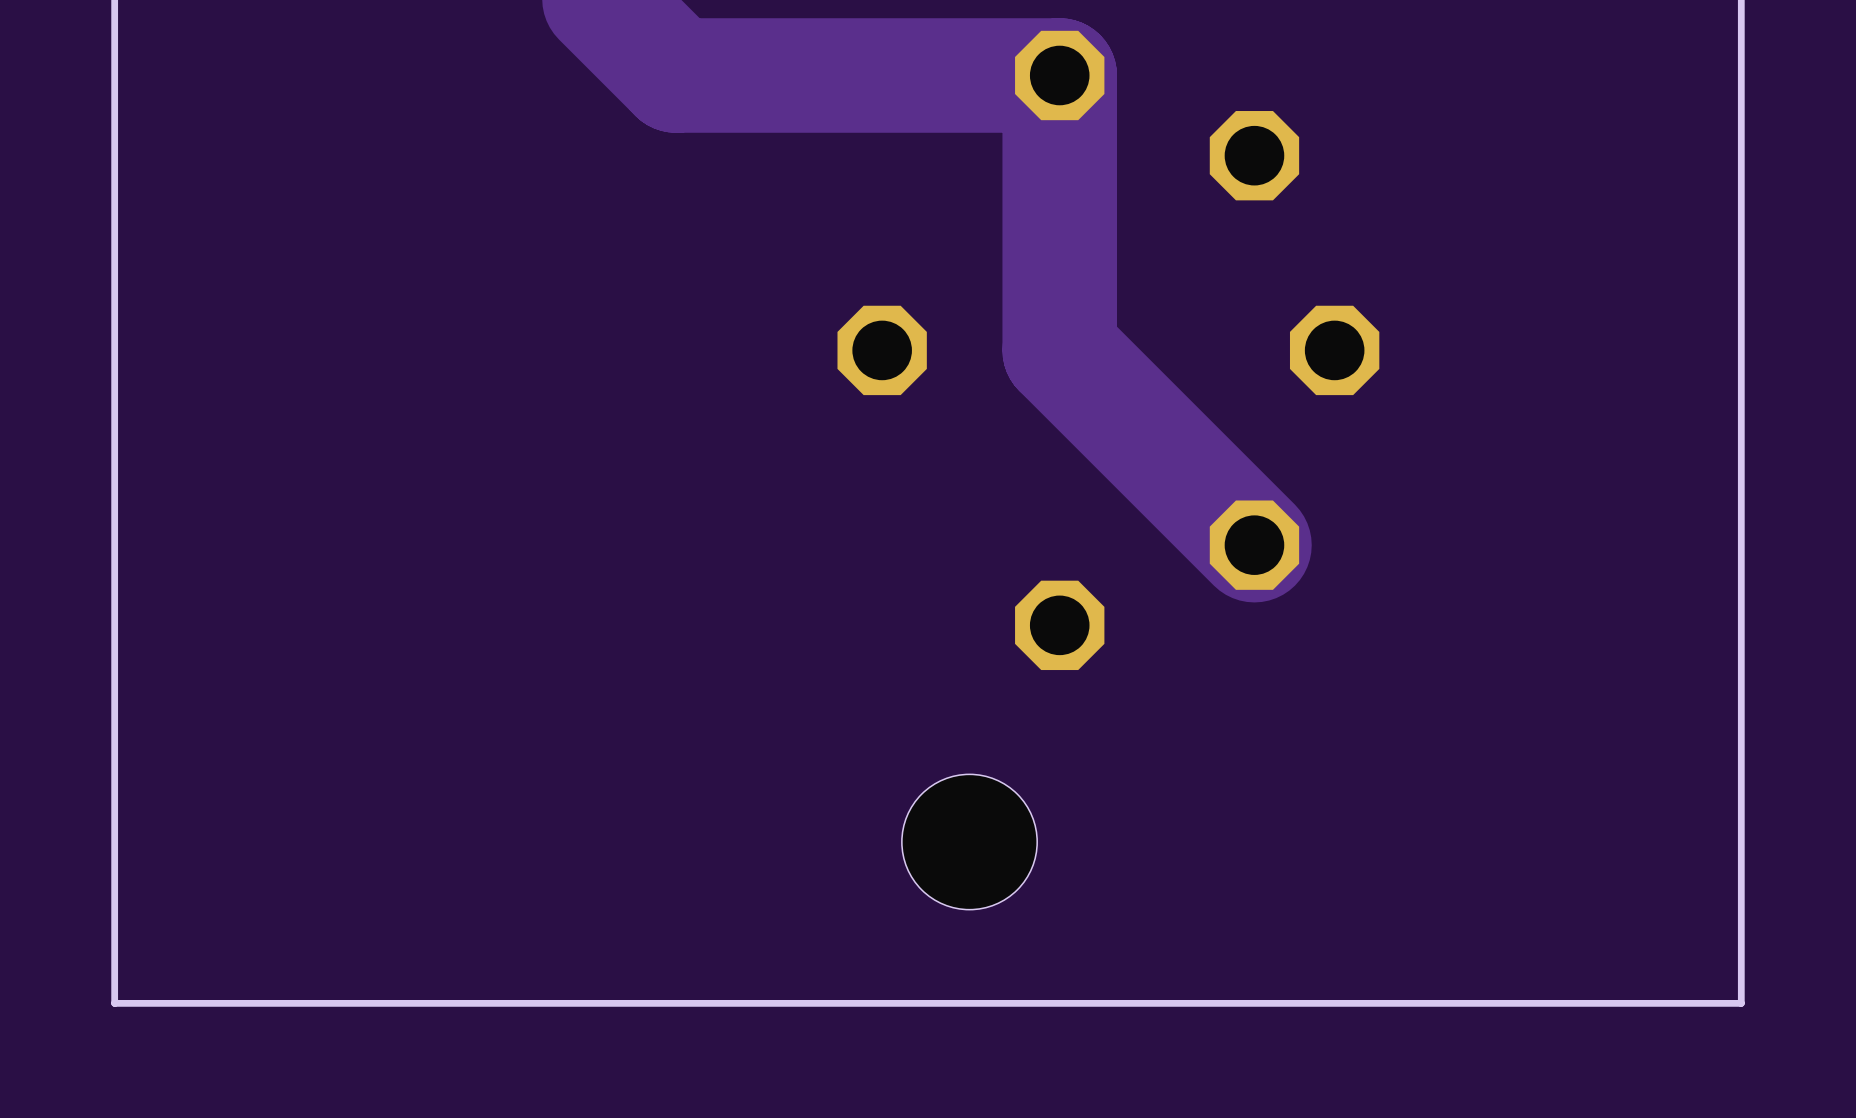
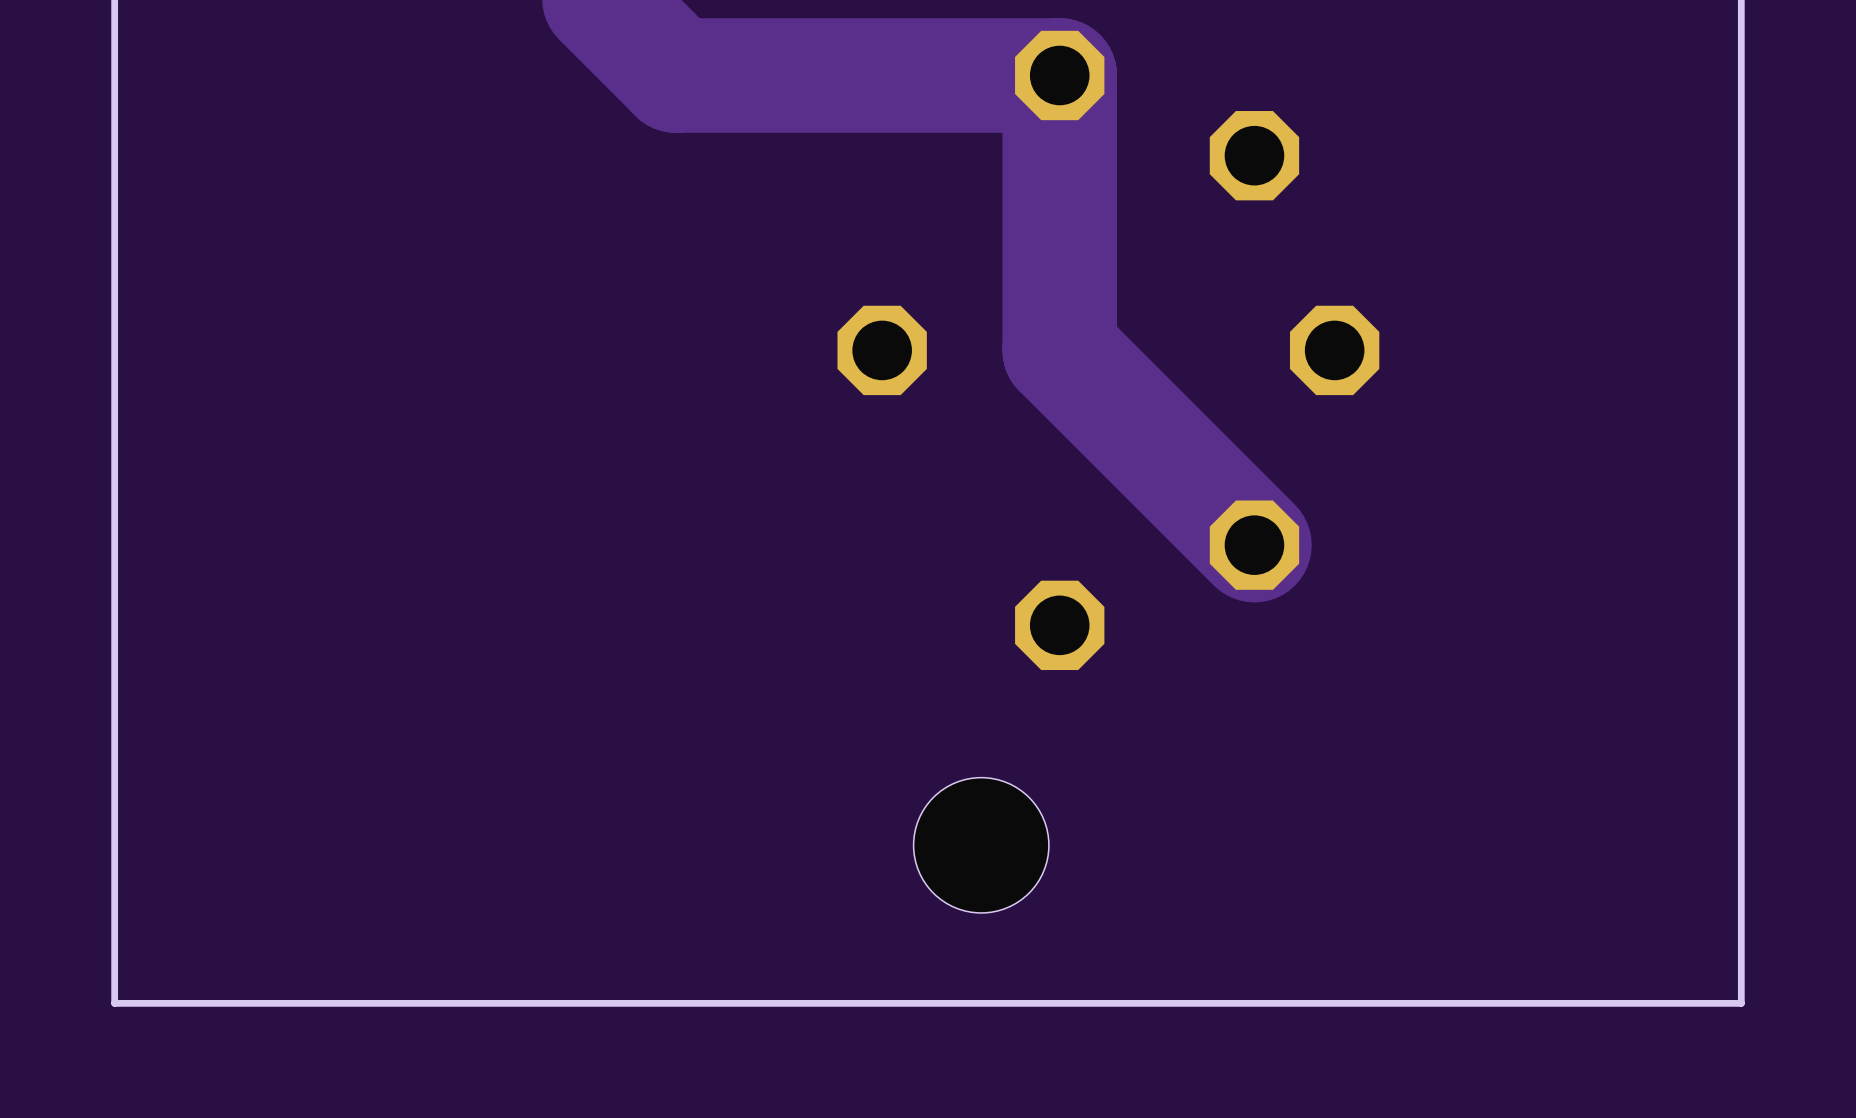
hole position: (969, 842) -> (981, 845)

